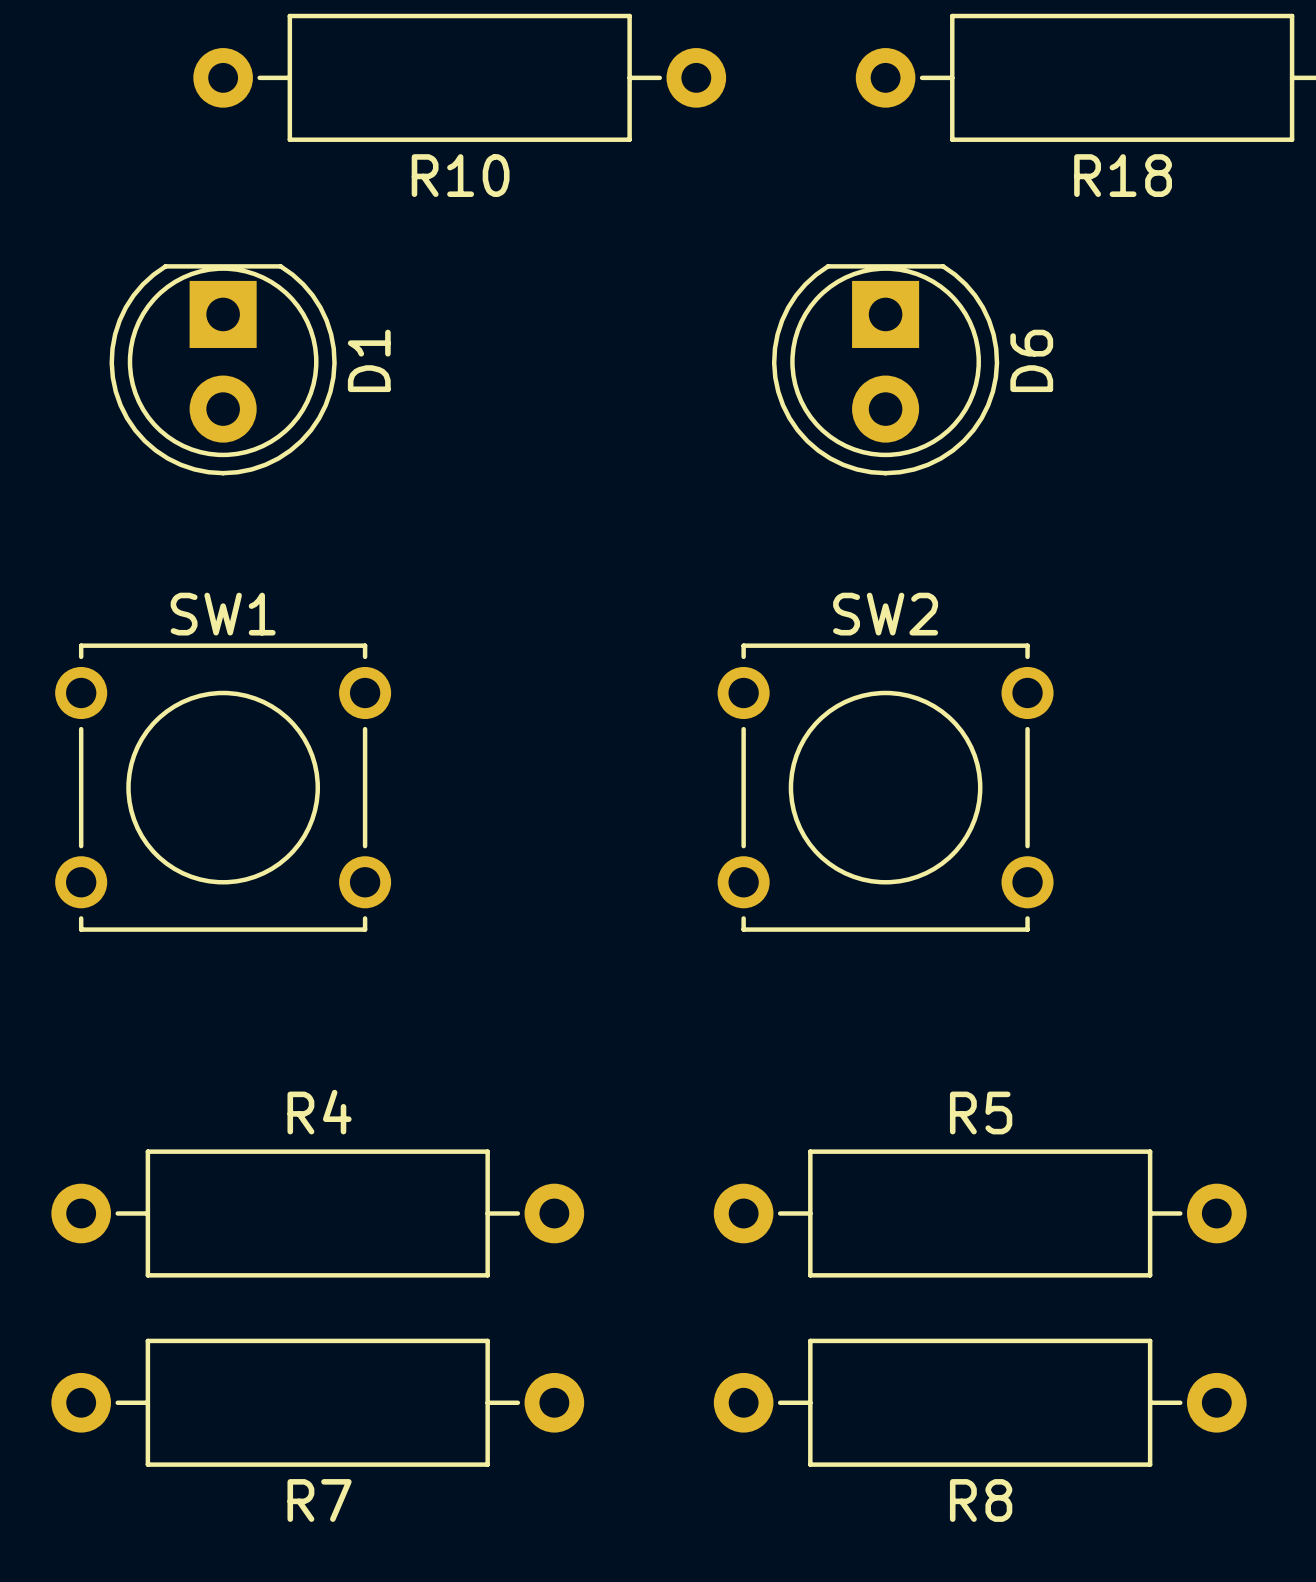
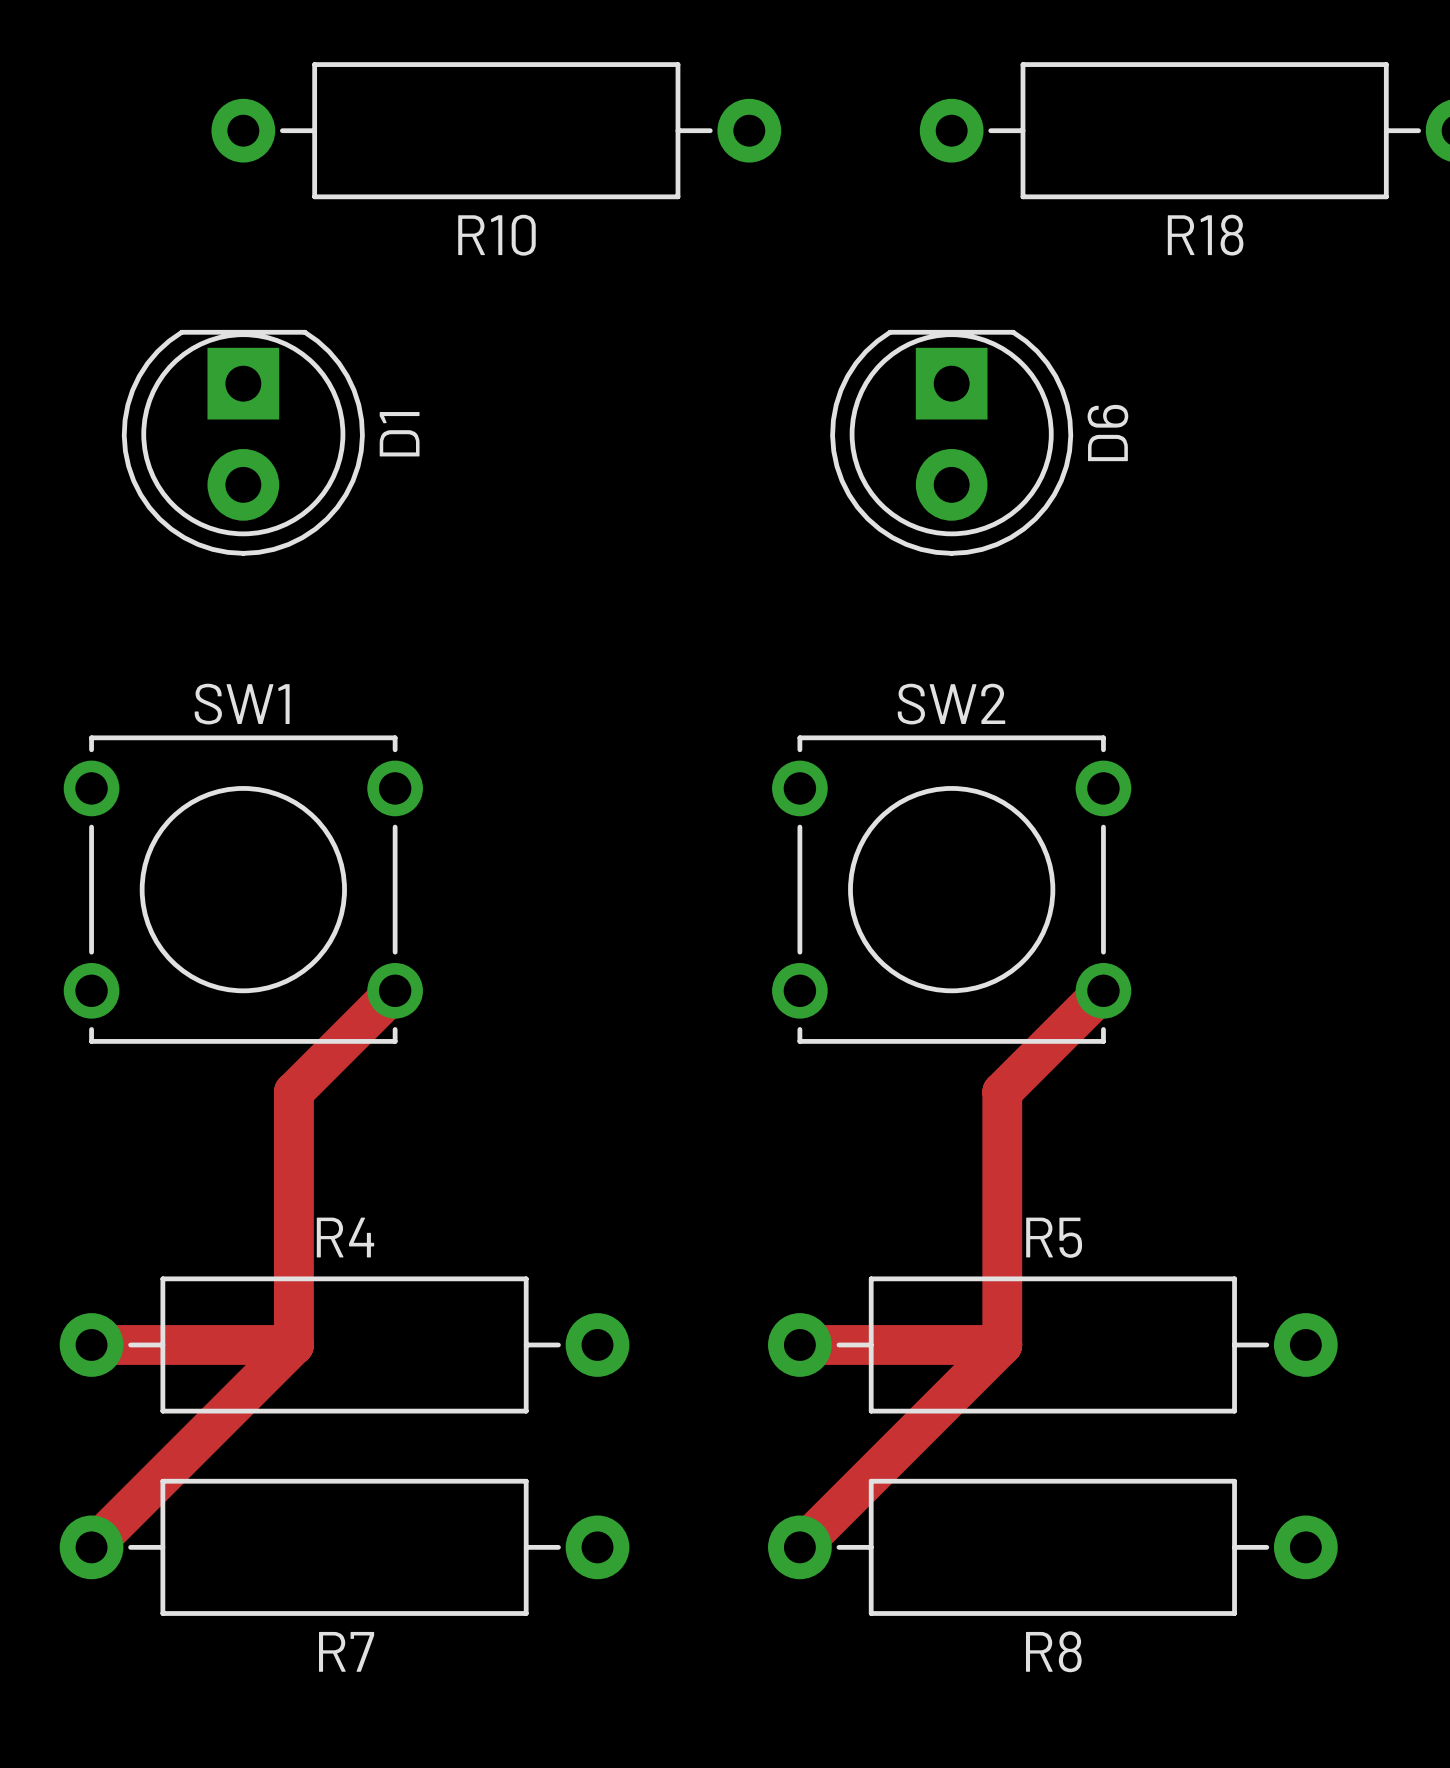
track: none -> (395, 990) (293, 1092) (293, 1344)
track: none -> (1103, 990) (1002, 1092) (1002, 1344)
track: none -> (91, 1344) (293, 1344)
track: none -> (293, 1344) (91, 1547)
track: none -> (799, 1344) (1002, 1344)
track: none -> (1002, 1344) (799, 1547)

